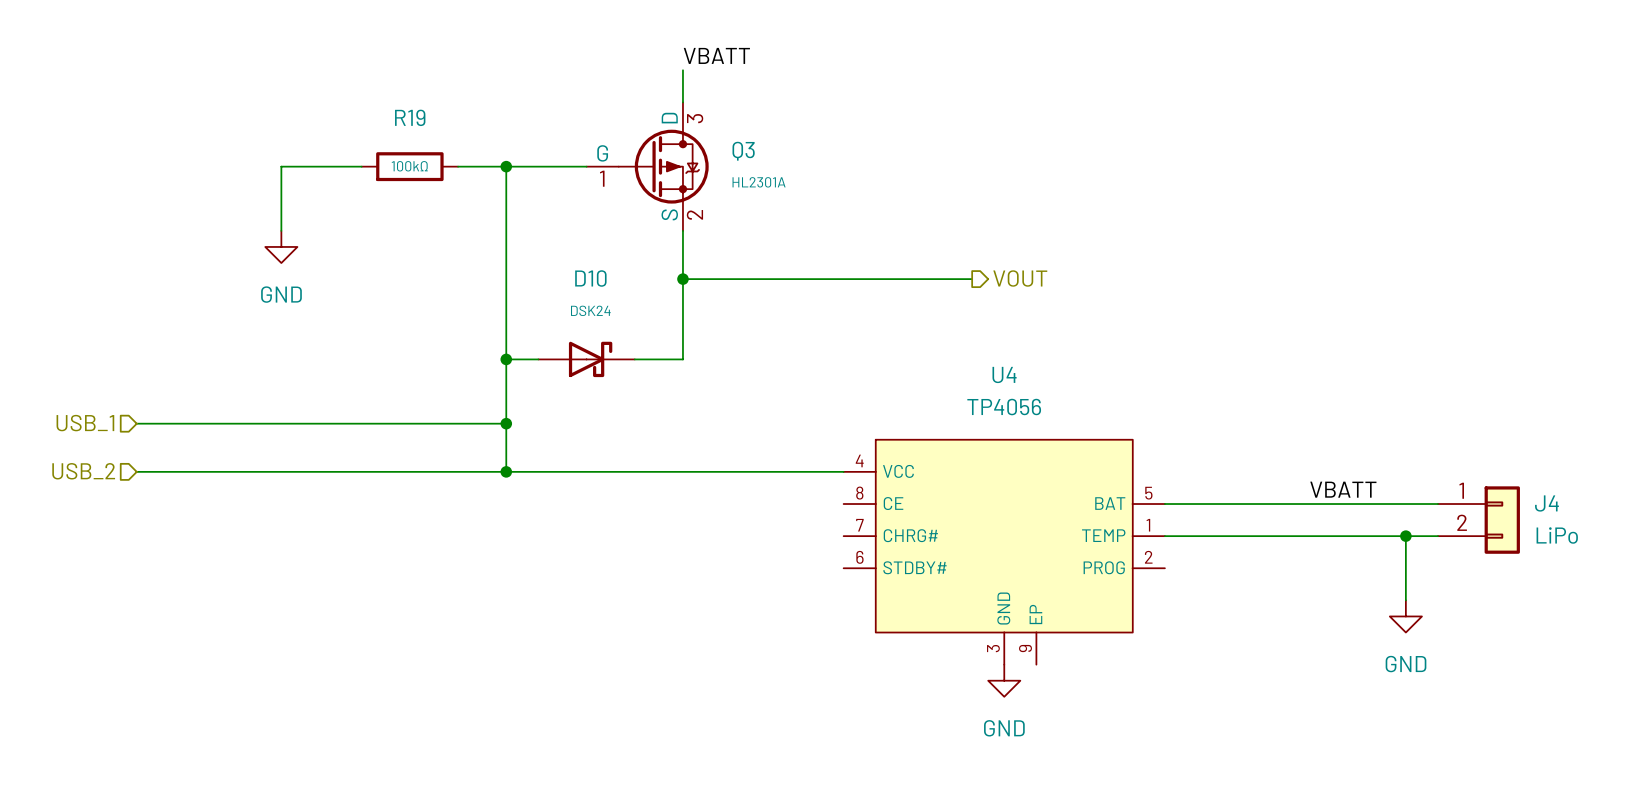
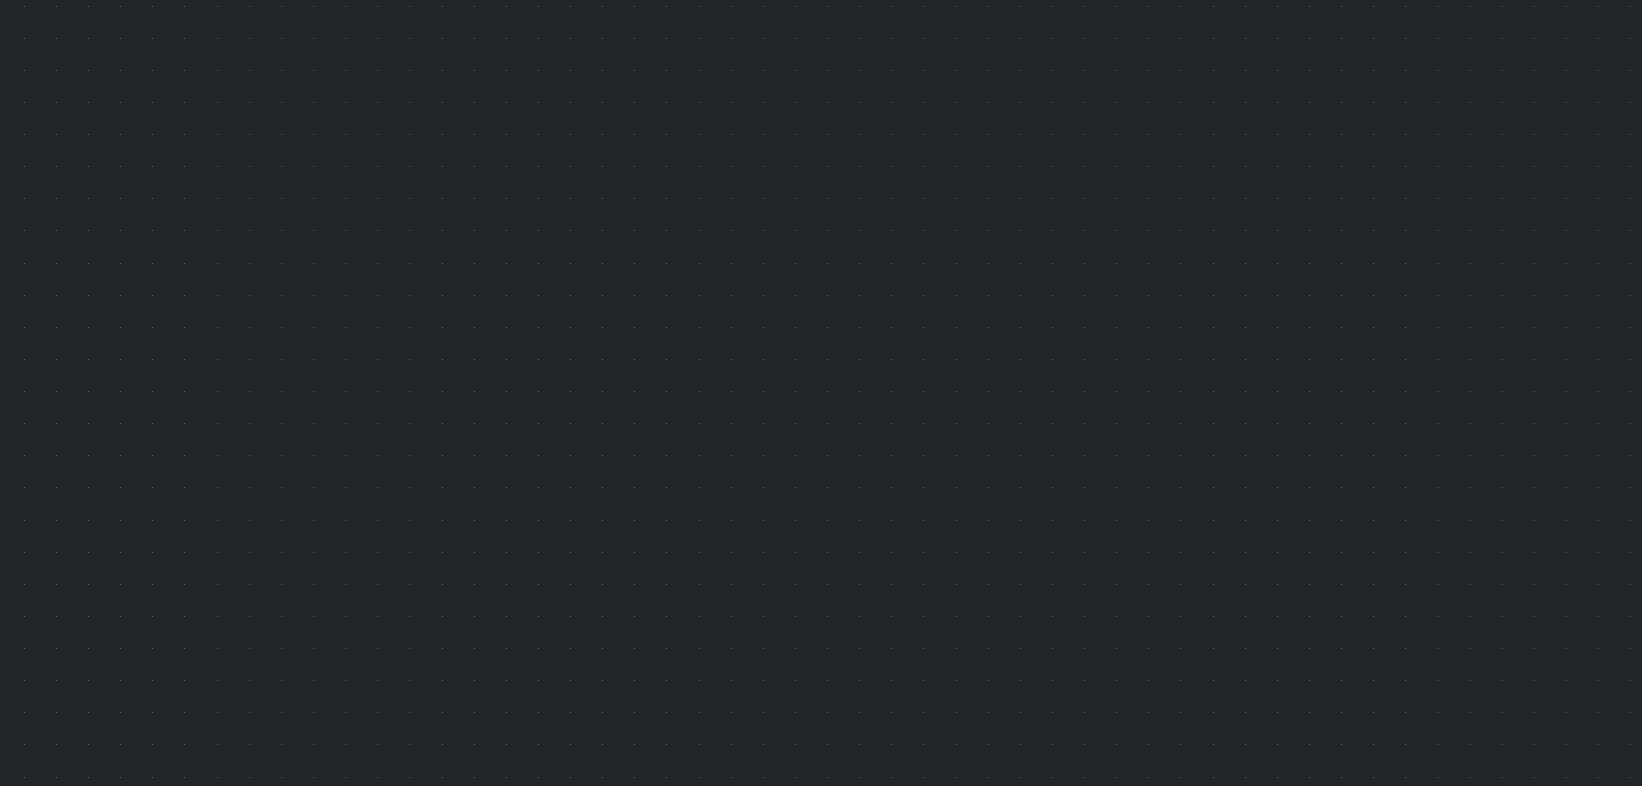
label: VBATT (716, 55) -> none
wire: (682, 70) (682, 102) -> none
wire: (361, 166) (281, 166) (281, 230) -> none
R19: 100kΩ (409, 166) -> none
wire: (458, 166) (586, 166) -> none
wire: (506, 166) (506, 471) -> none
junction: (506, 166) -> none
Q3: HL2301A (647, 166) -> none
wire: (682, 230) (682, 359) (634, 359) -> none
power symbol: GND (281, 246) -> none
hierarchical label: VOUT (1020, 278) -> none
wire: (682, 279) (972, 279) -> none
junction: (682, 279) -> none
wire: (506, 359) (538, 359) -> none
junction: (506, 359) -> none
D10: DSK24 (586, 359) -> none
hierarchical label: USB_1 (85, 423) -> none
wire: (136, 423) (506, 423) -> none
junction: (506, 423) -> none
hierarchical label: USB_2 (83, 471) -> none
wire: (136, 471) (843, 471) -> none
junction: (506, 471) -> none
label: VBATT (1343, 489) -> none
wire: (1164, 504) (1438, 504) -> none
J4: LiPo (1478, 520) -> none
wire: (1164, 536) (1438, 536) -> none
wire: (1405, 536) (1405, 600) -> none
junction: (1405, 536) -> none
U4: TP4056 (1004, 552) -> none
power symbol: GND (1405, 616) -> none
power symbol: GND (1004, 680) -> none

